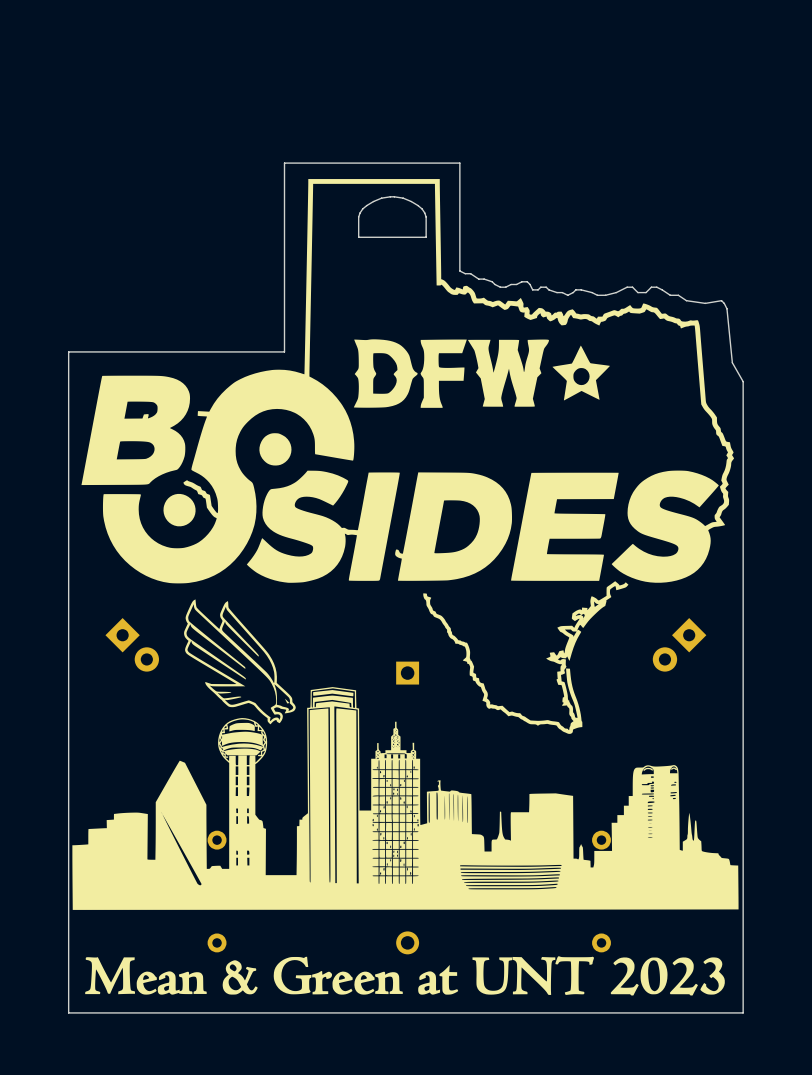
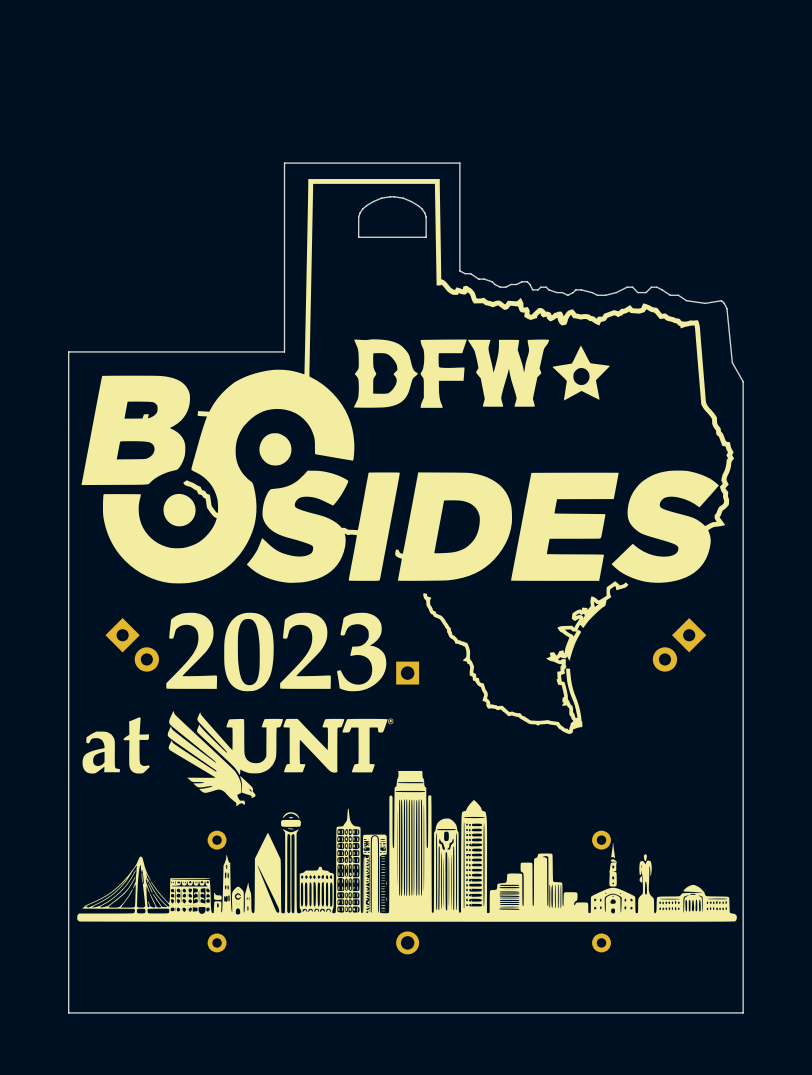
drawing: [72, 599, 739, 996] -> none
drawing: none -> [77, 612, 737, 922]

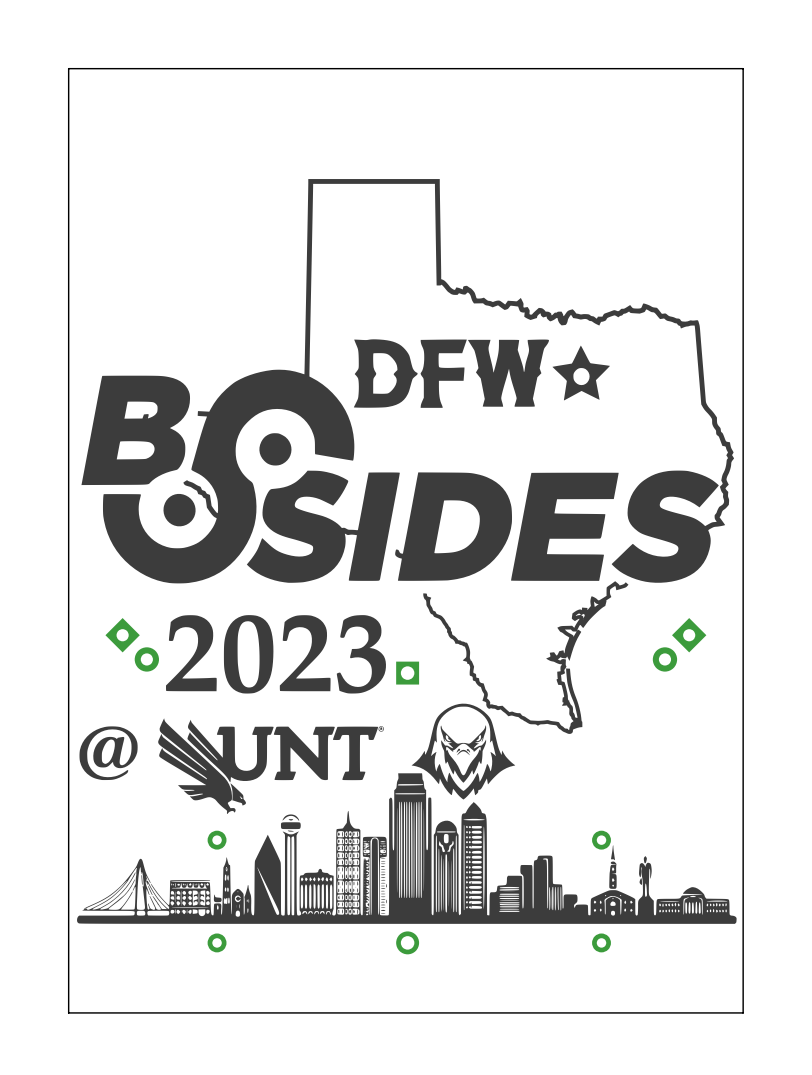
board edge: (390, 196) (403, 198) (422, 208) (426, 217) (426, 237) (358, 237) (358, 217) (362, 208) (373, 201) (390, 196) -> none
board edge: (68, 351) (284, 351) (284, 163) (459, 163) (459, 271) (470, 273) (478, 279) (492, 281) (500, 287) (527, 281) (532, 289) (546, 287) (548, 289) (567, 295) (575, 289) (605, 295) (627, 287) (632, 287) (637, 292) (646, 292) (651, 287) (656, 287) (670, 295) (678, 295) (686, 300) (705, 303) (721, 300) (726, 308) (732, 362) (743, 381) -> (68, 351) (68, 68) (743, 68) (743, 381)
drawing shape: [77, 612, 737, 922] -> [77, 615, 737, 924]

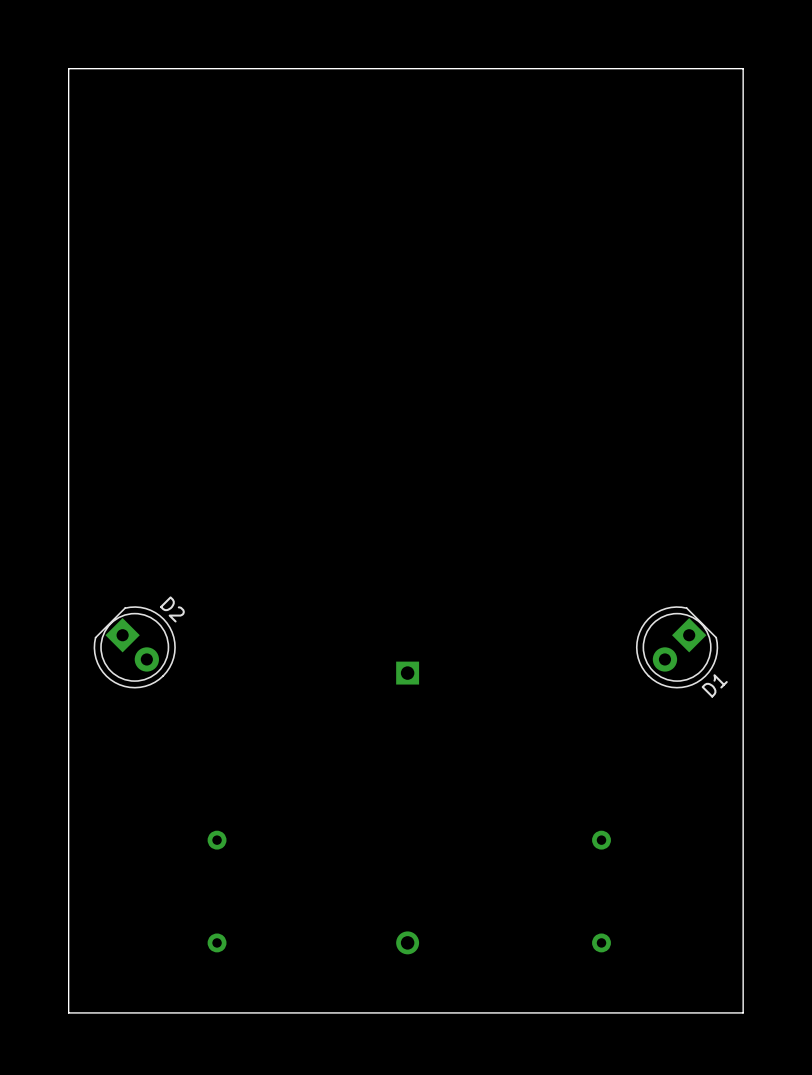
drawing: [77, 179, 737, 924] -> none
part: (132, 644) -> none
part: (679, 644) -> none
D2: none -> (134, 647)
D1: none -> (677, 647)

